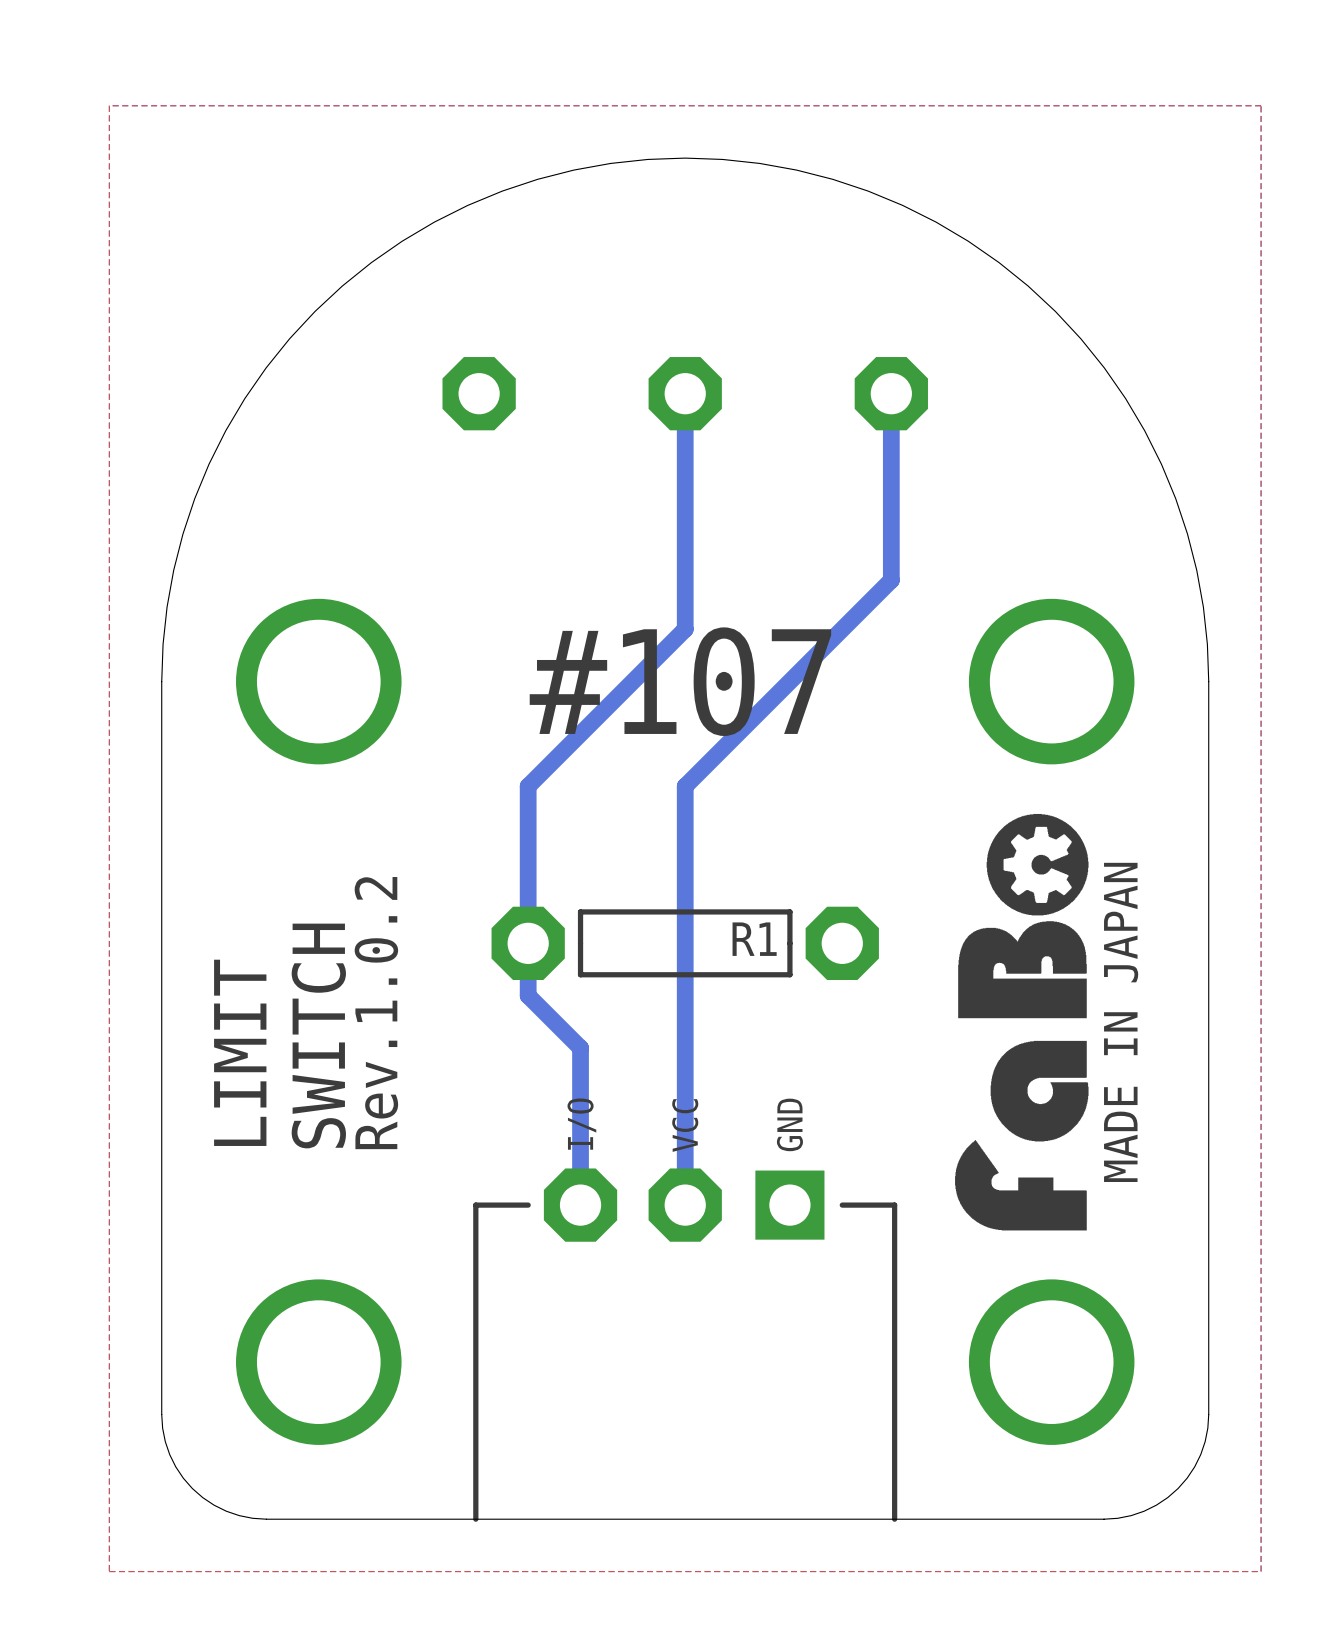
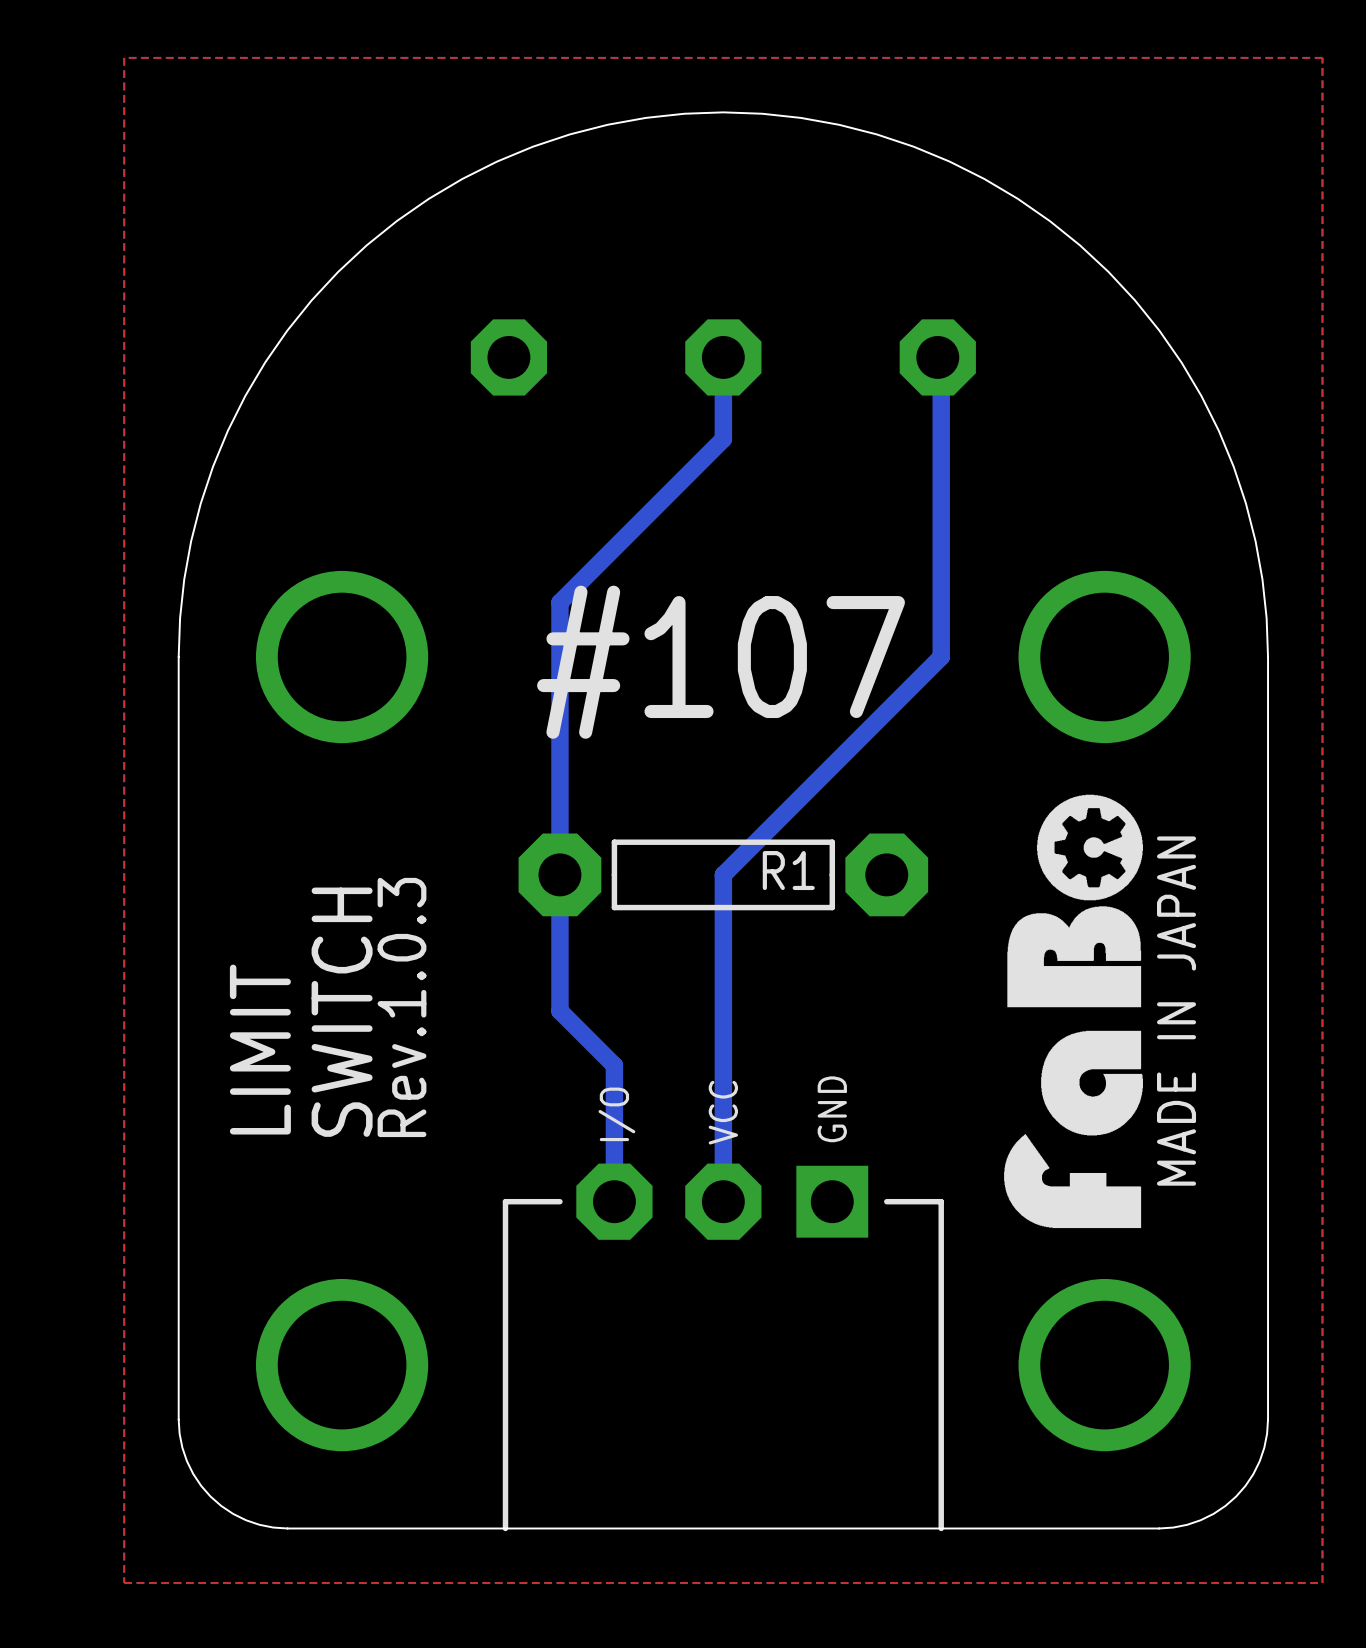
bottom track: (891, 393) (891, 580) (685, 786) (685, 891) -> (937, 357) (941, 360) (941, 657) (723, 874)
bottom track: (685, 472) (685, 629) (528, 786) -> (723, 439) (559, 602) (559, 765)
R1 footprint: [491, 906, 879, 981] -> [518, 833, 929, 917]
bottom track: (528, 995) (580, 1048) (580, 1074) -> (559, 983) (559, 1011) (614, 1065)
text: Rev.1.0.2 (376, 1013) -> Rev.1.0.3 (402, 1007)

